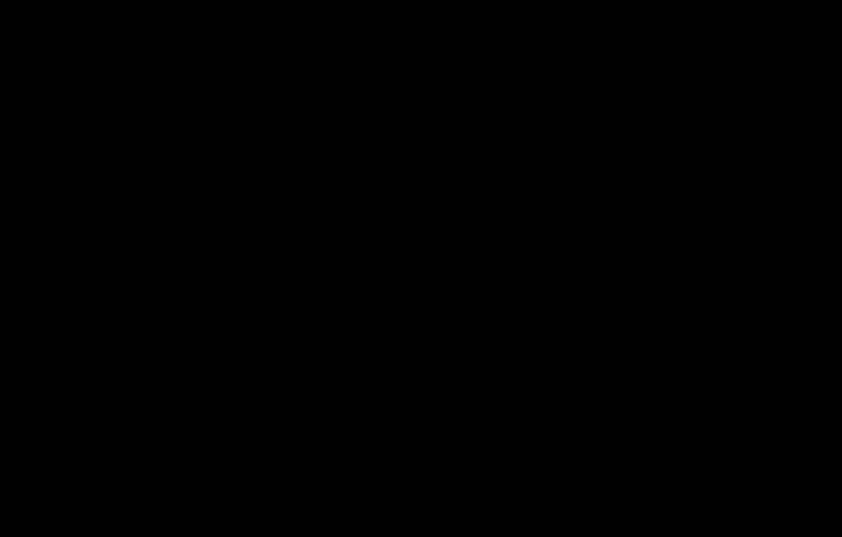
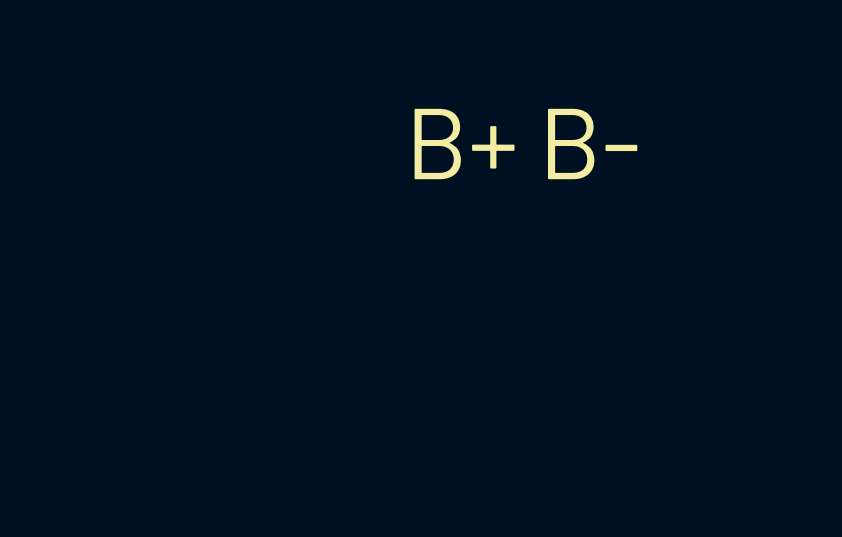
text: none -> B+ B- (525, 144)

